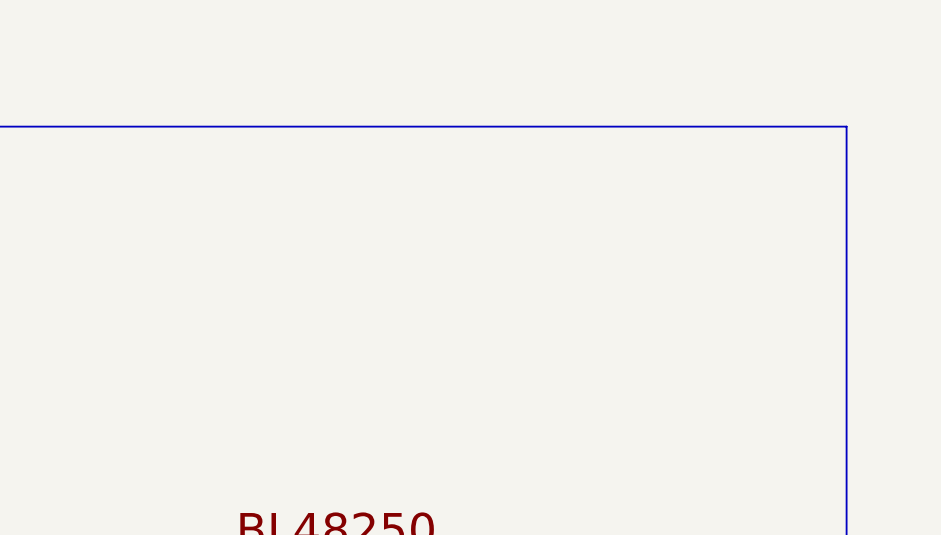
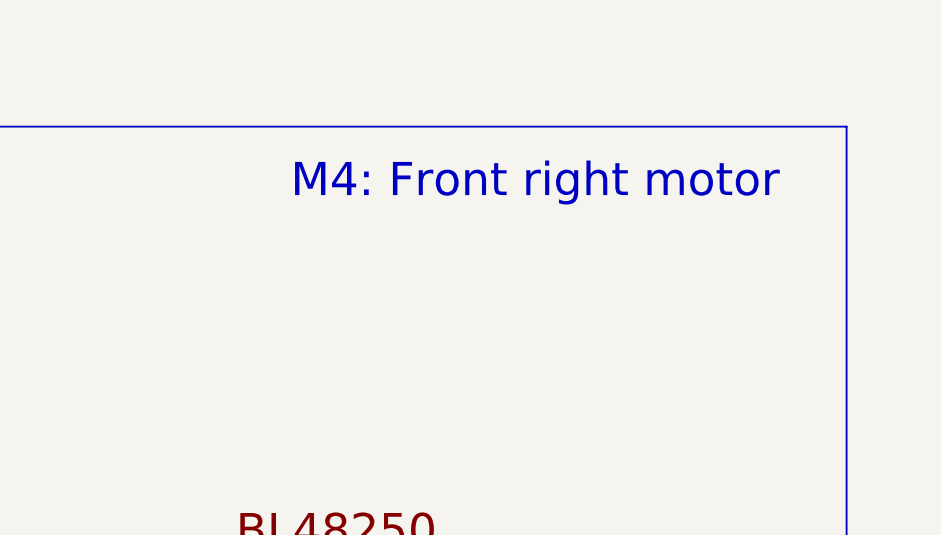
text: none -> M4: Front right motor (537, 182)

